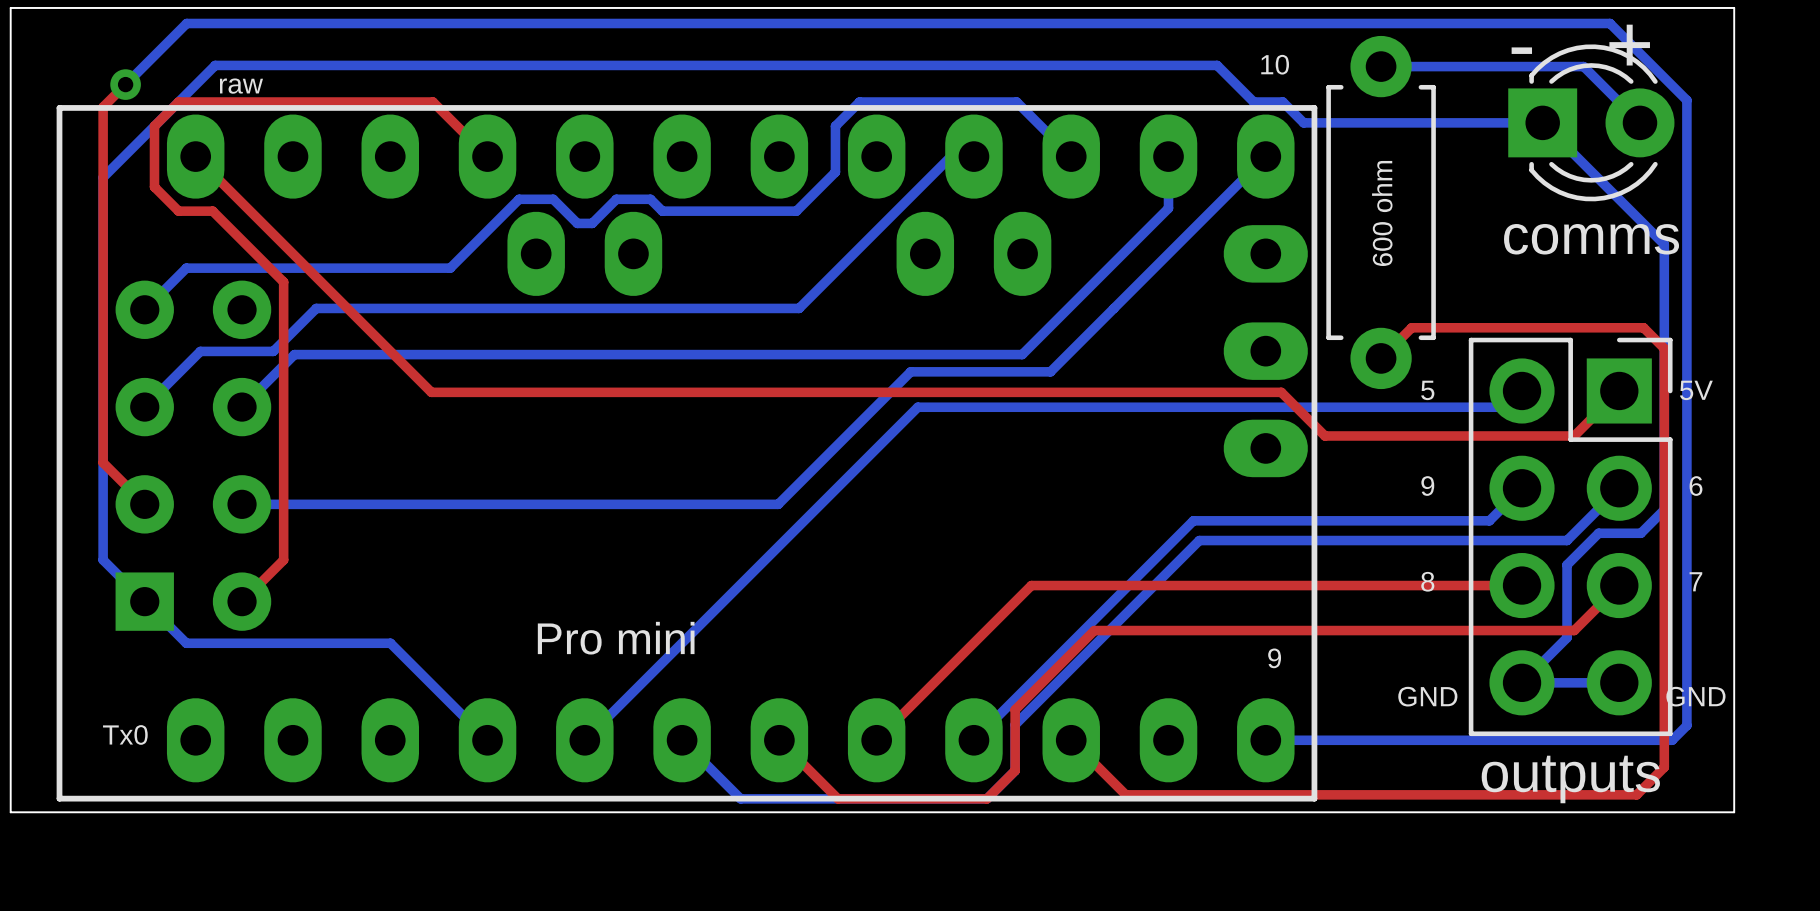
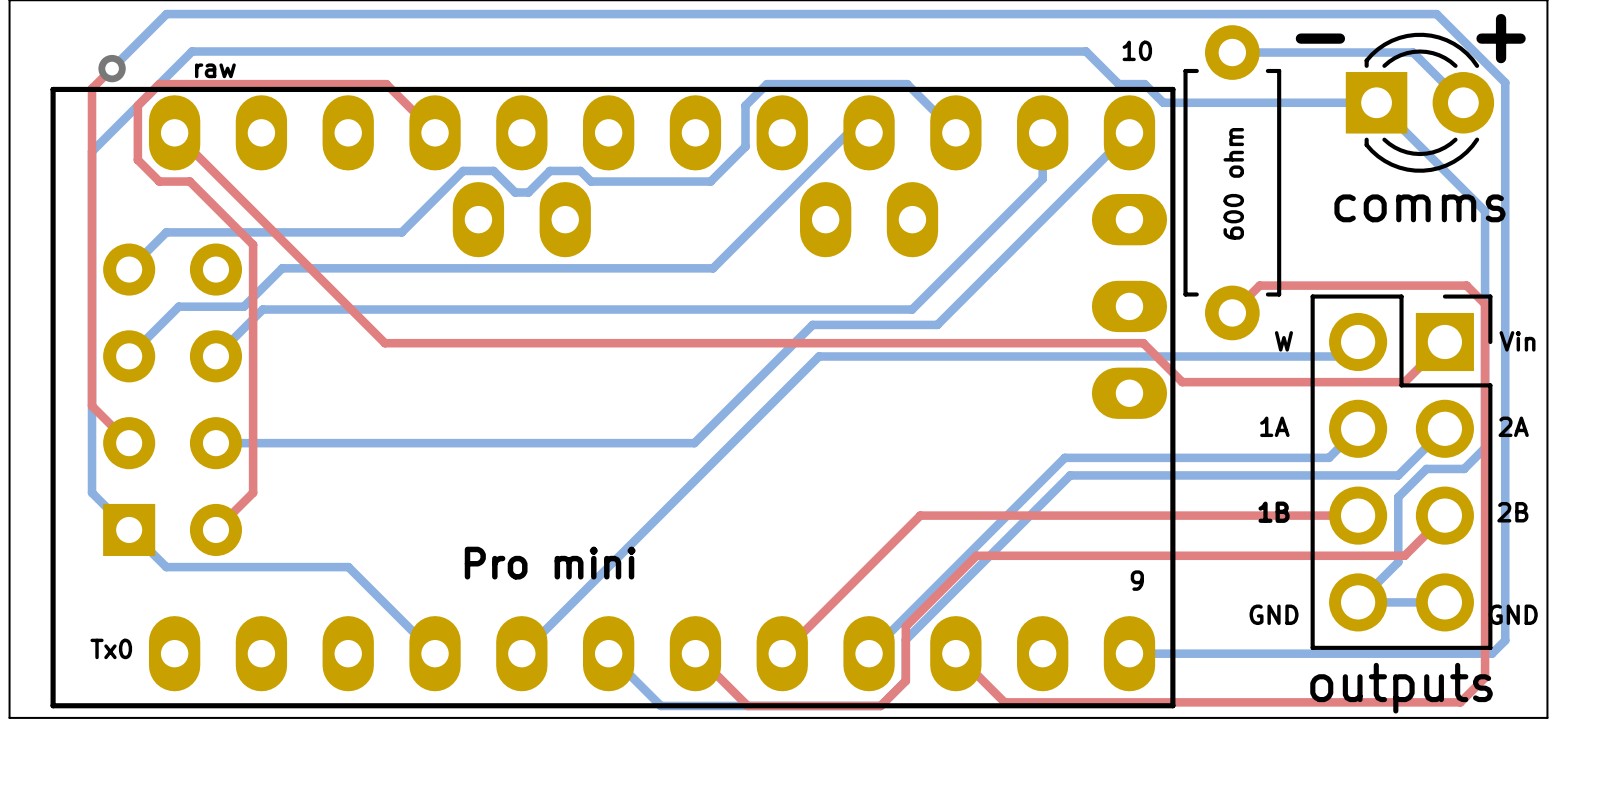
text: 5 (1427, 390) -> W (1283, 341)
text: 5V (1696, 390) -> Vin (1517, 341)
text: 9 (1427, 486) -> 1A (1274, 426)
text: 6 (1696, 486) -> 2A (1513, 426)
text: 8 (1427, 581) -> 1B (1274, 512)
text: 7 (1695, 581) -> 2B (1512, 512)

